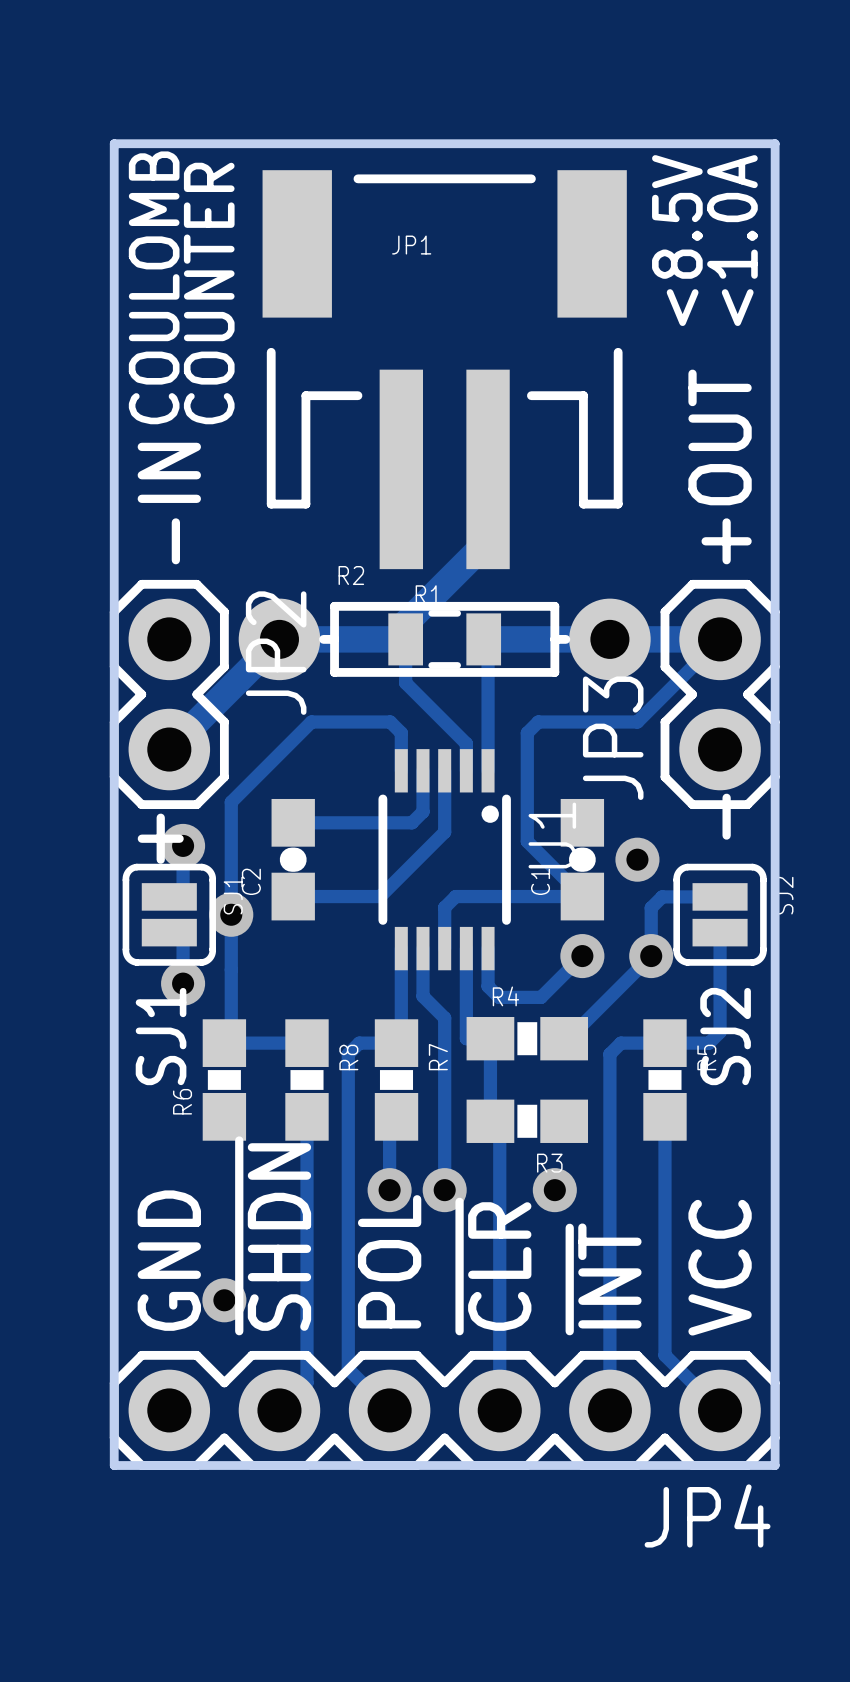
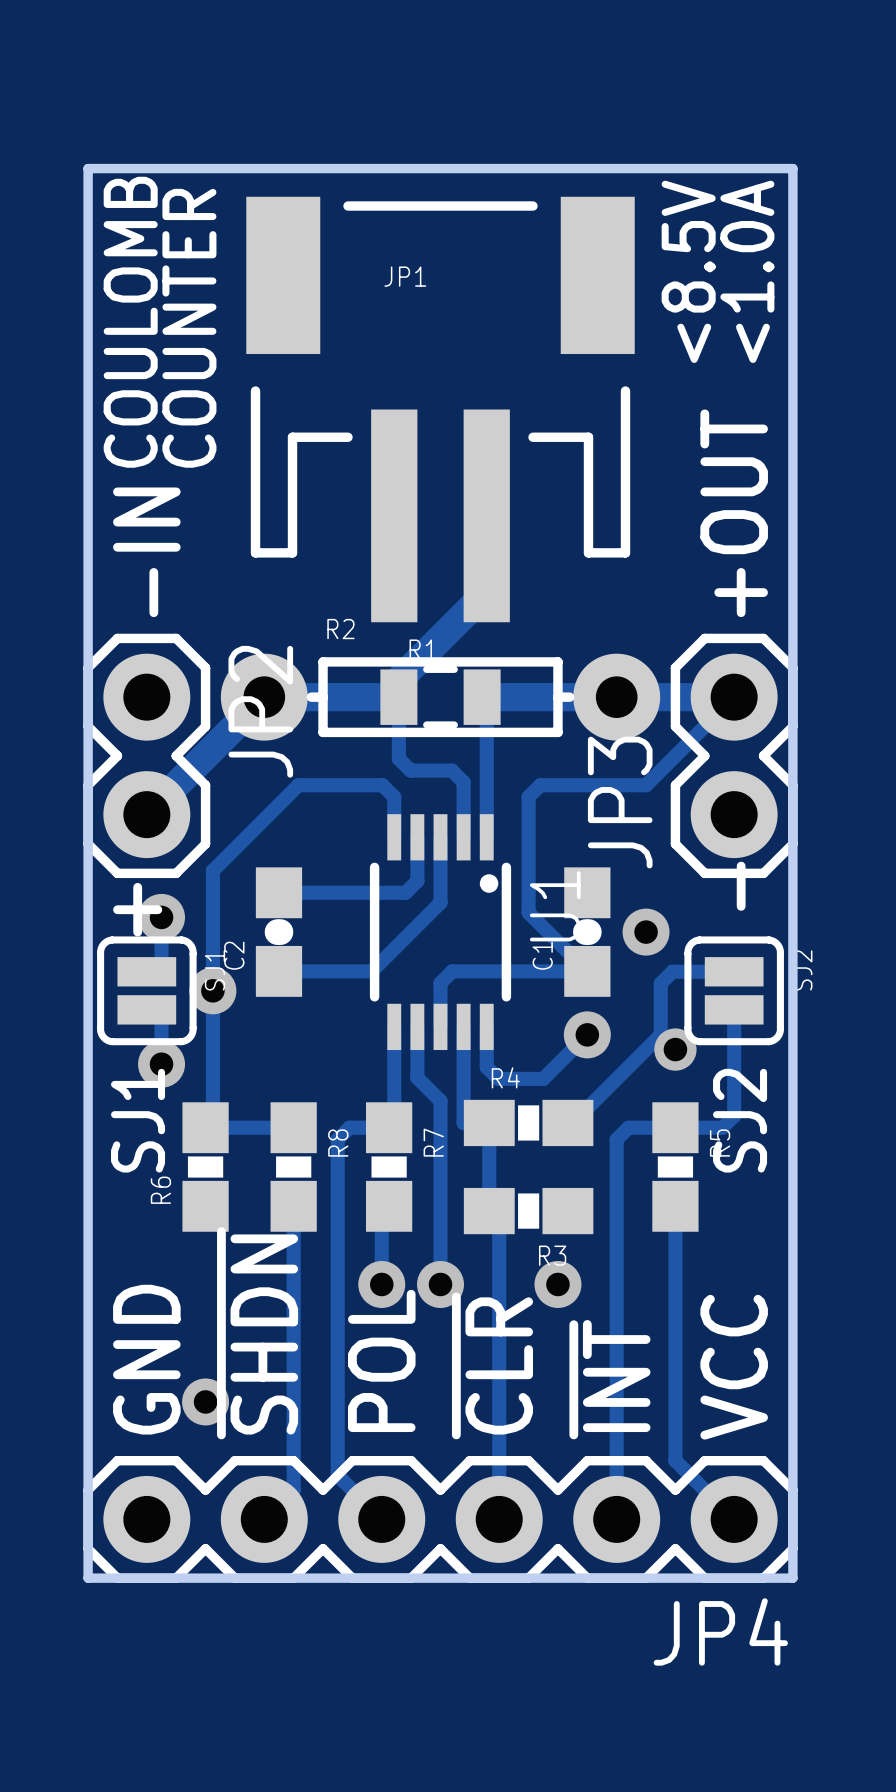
track: (405, 682) (466, 743) -> (398, 743) (398, 758) (410, 770) (451, 770) (463, 782) (463, 808)
via position: (651, 956) -> (675, 1049)

